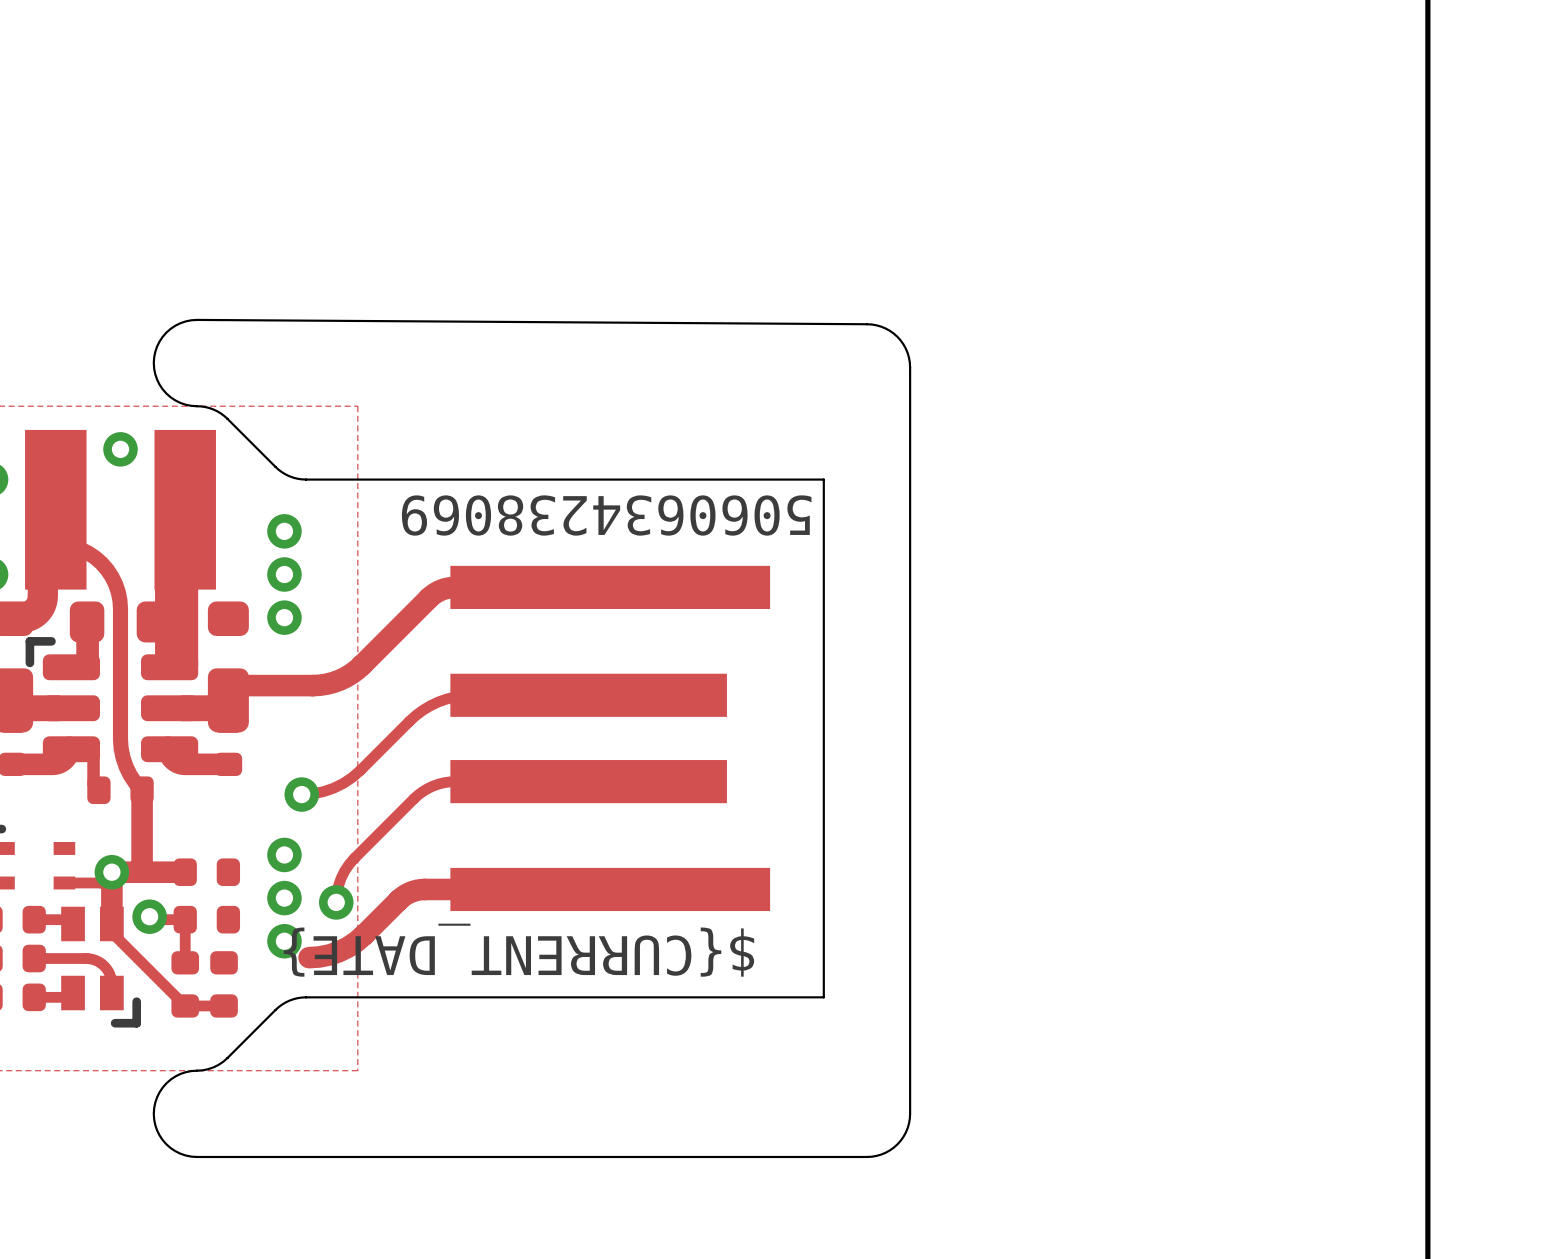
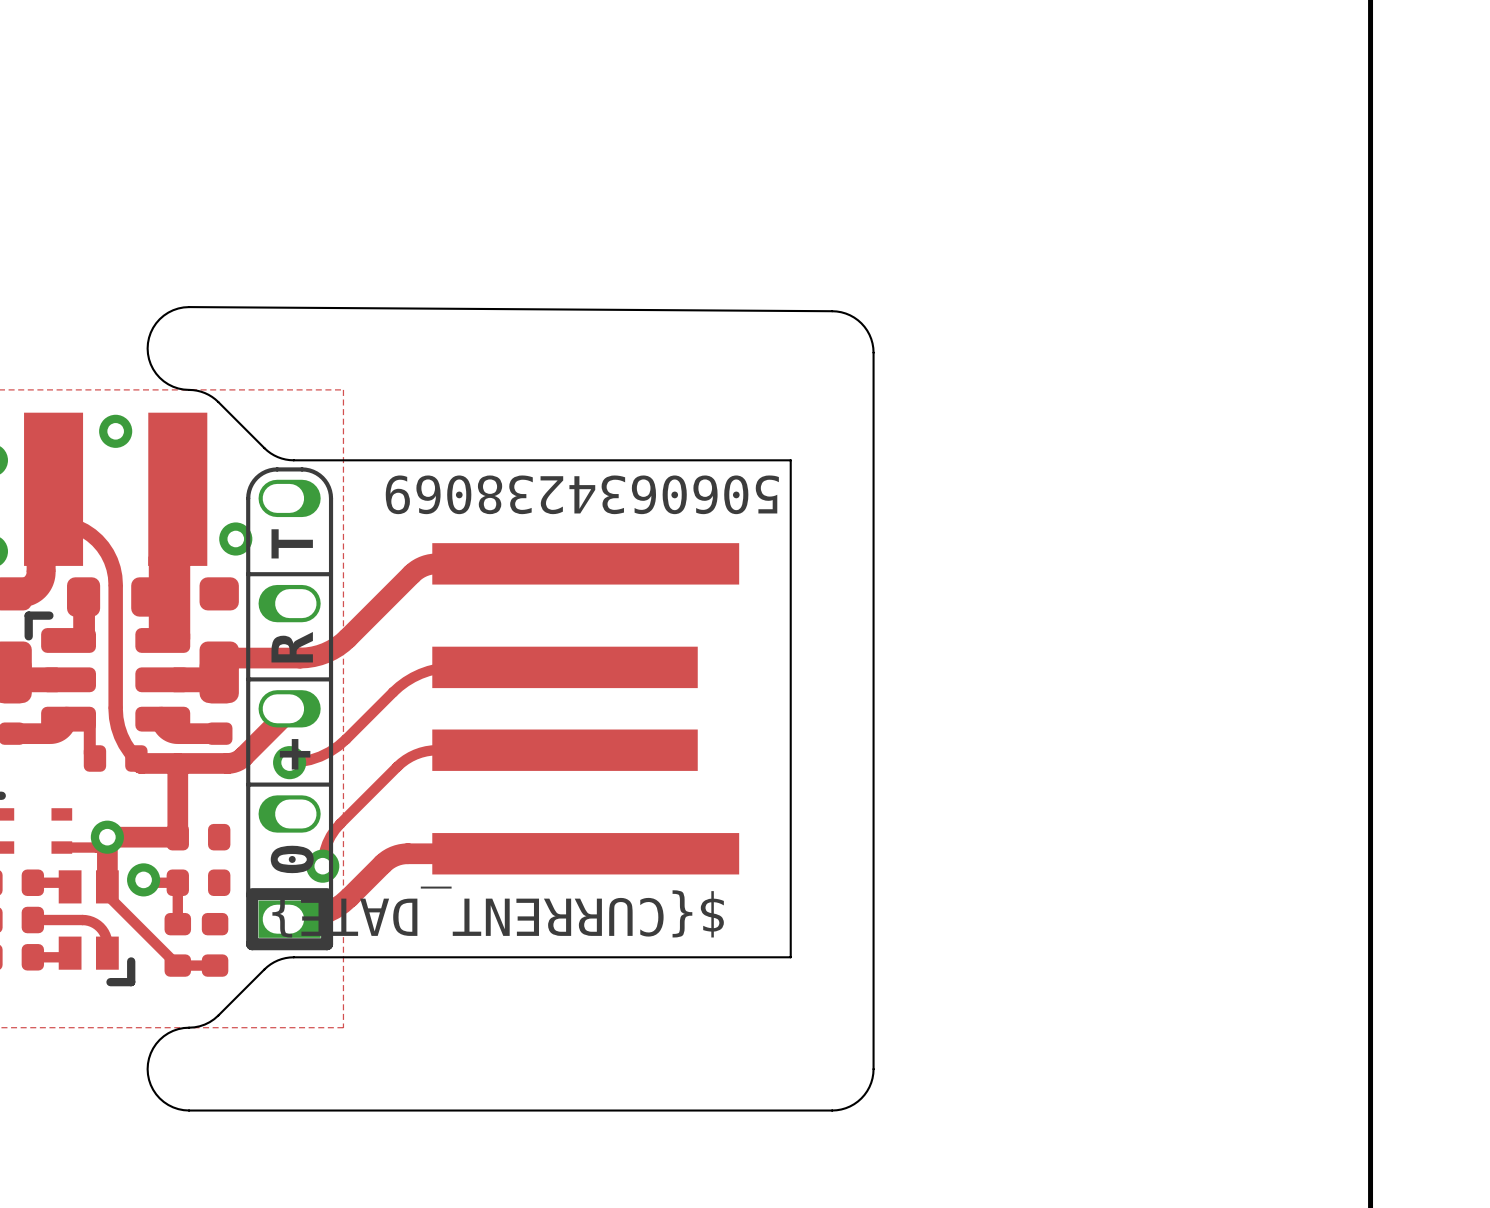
via: (284, 531) -> none
via: none -> (235, 539)
via: (284, 574) -> none
via: (284, 617) -> none
part: none -> (289, 708)
track: (142, 790) (142, 872) -> (136, 758) (141, 763) (233, 762) (243, 756) (283, 716)
track: none -> (177, 763) (177, 837)
via: (284, 854) -> none
via: (284, 898) -> none
via: (284, 941) -> none

